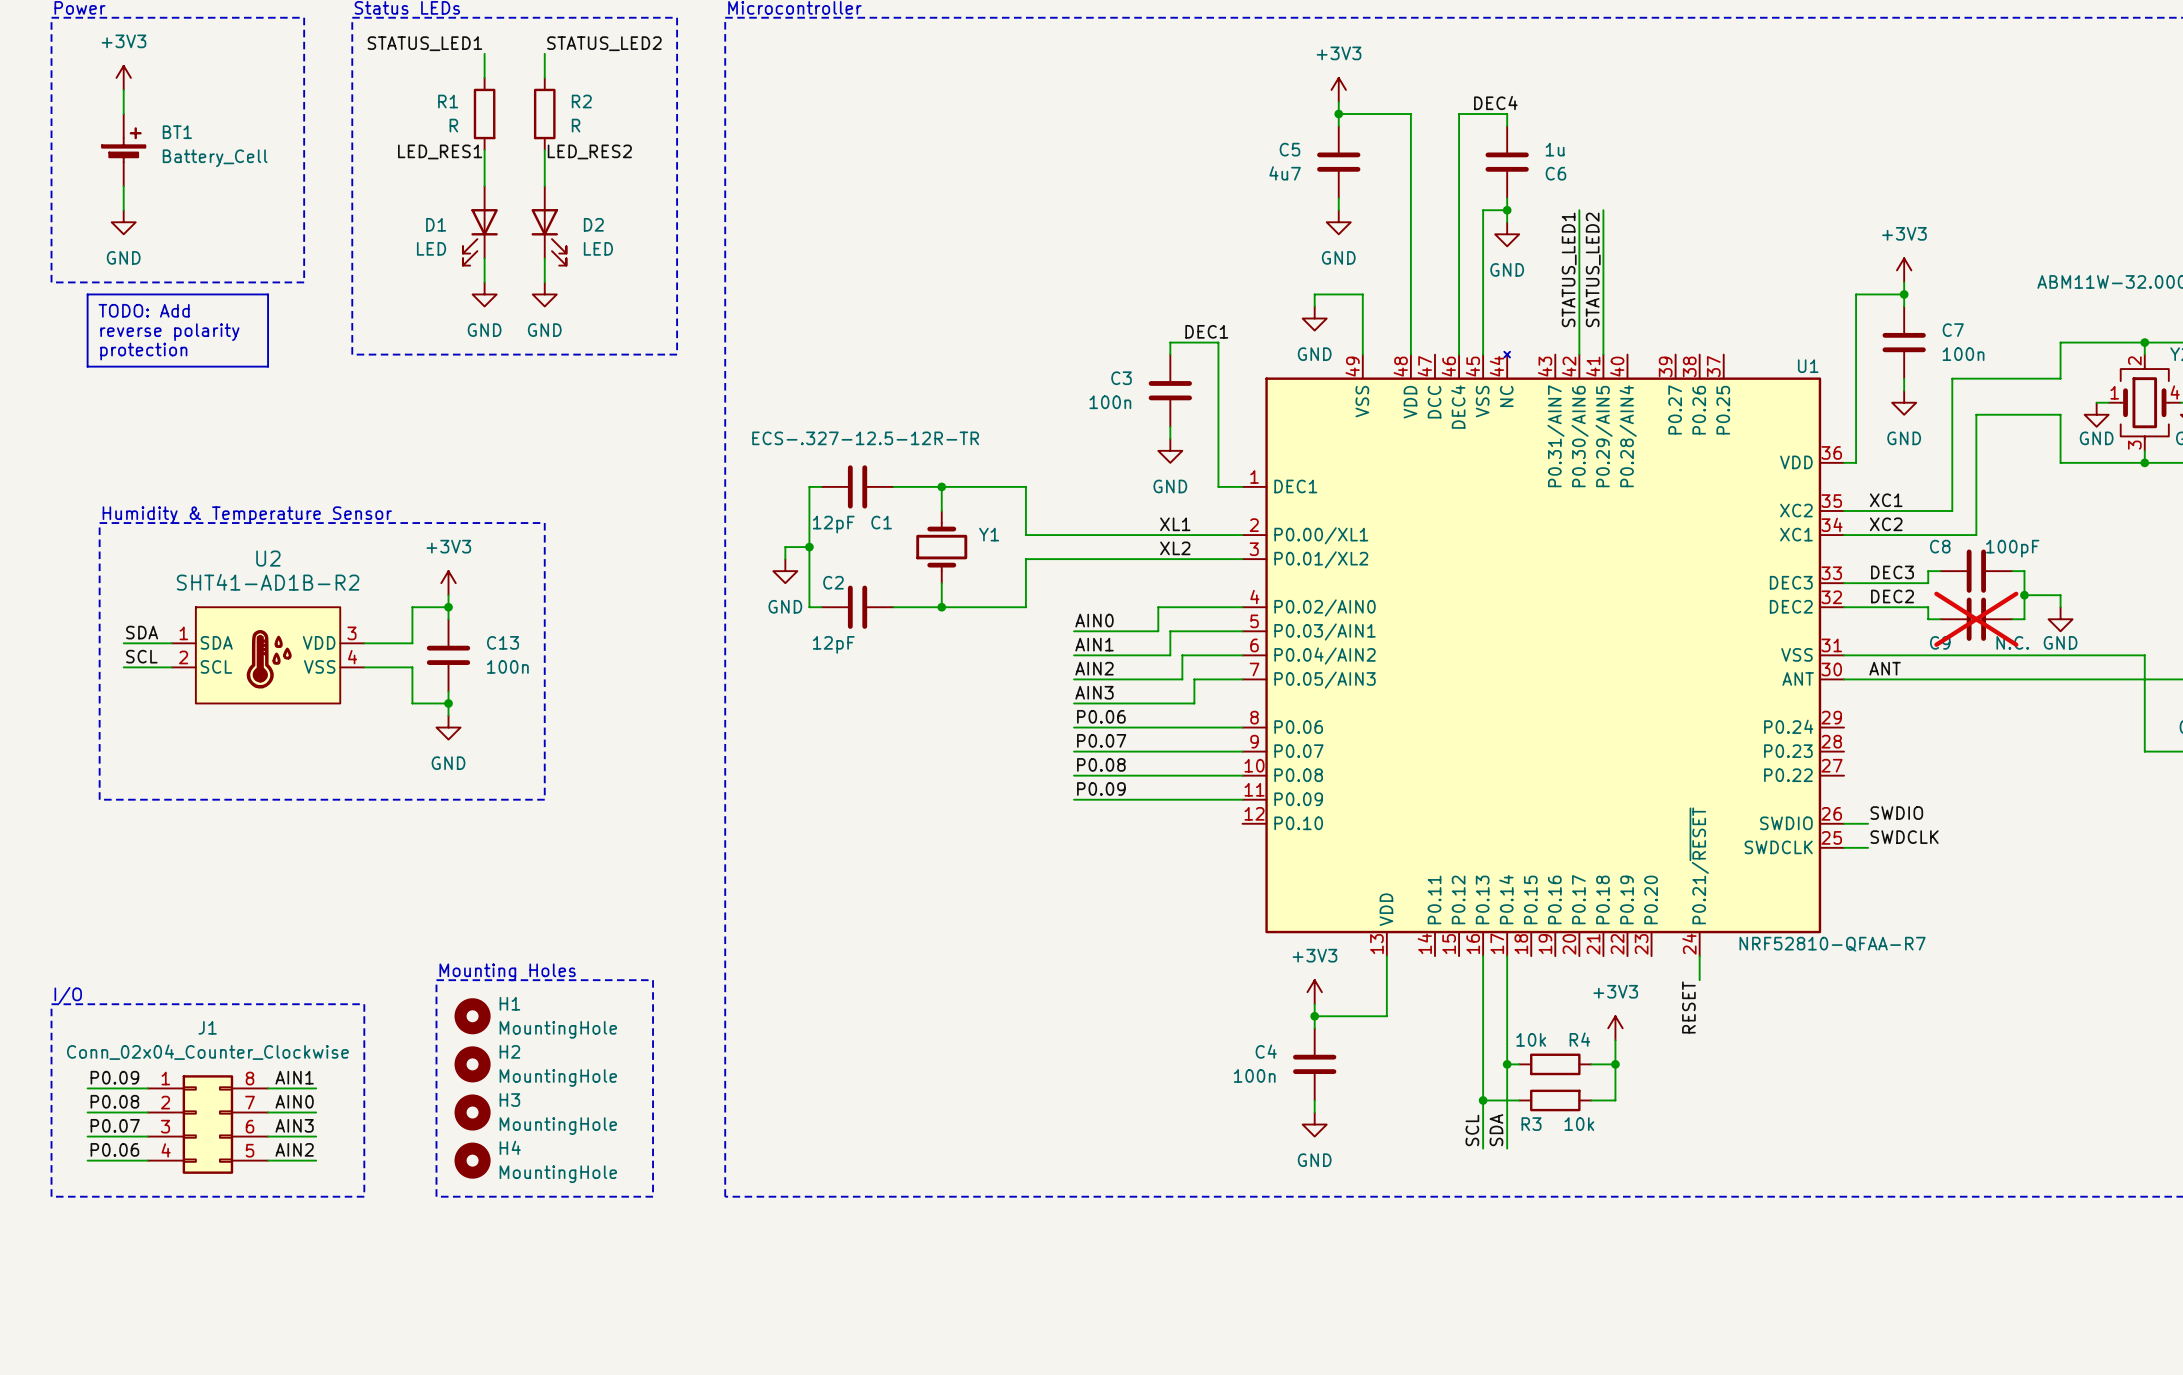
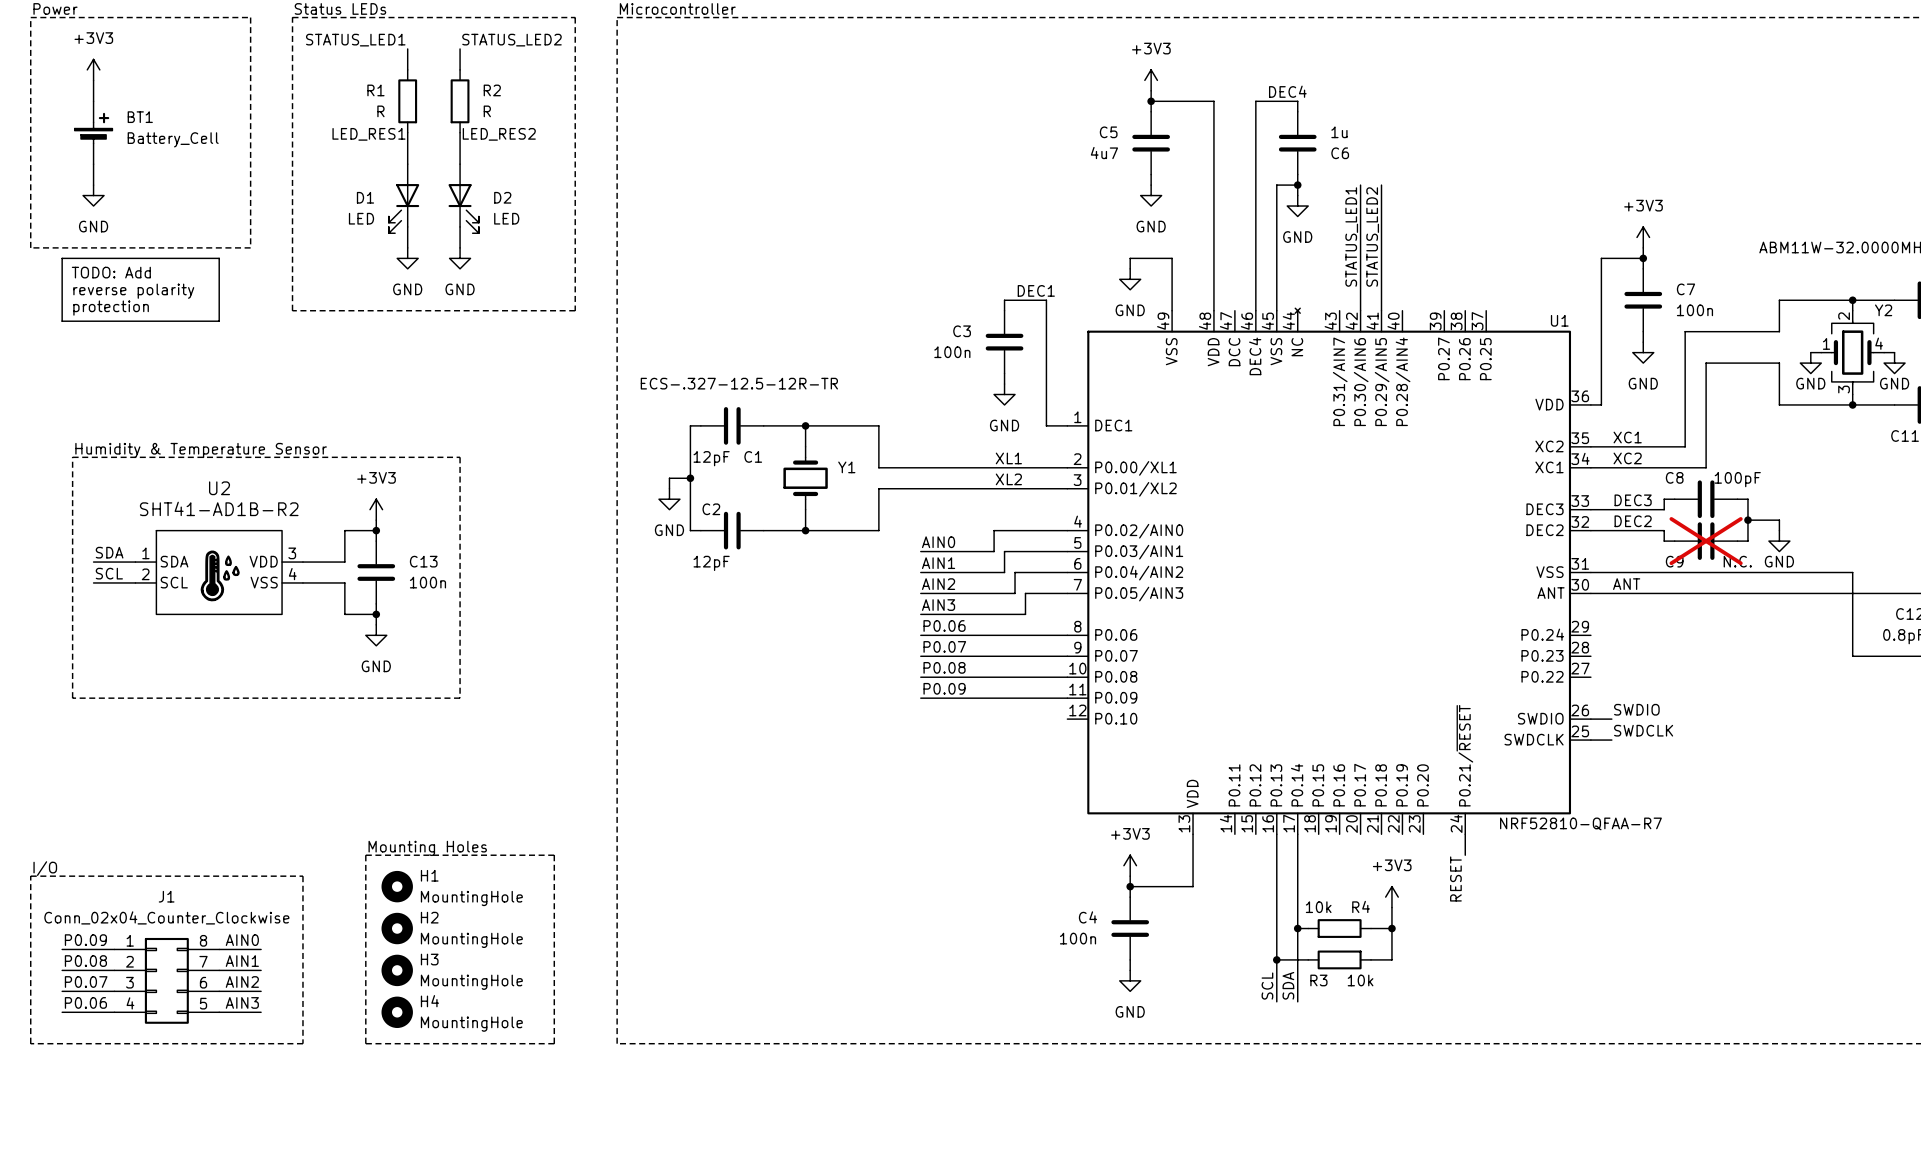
label: AIN1 (294, 1077) -> AIN0 (242, 940)
label: AIN0 (294, 1101) -> AIN1 (242, 961)
label: AIN3 (294, 1125) -> AIN2 (242, 982)
label: AIN2 (294, 1149) -> AIN3 (242, 1002)

